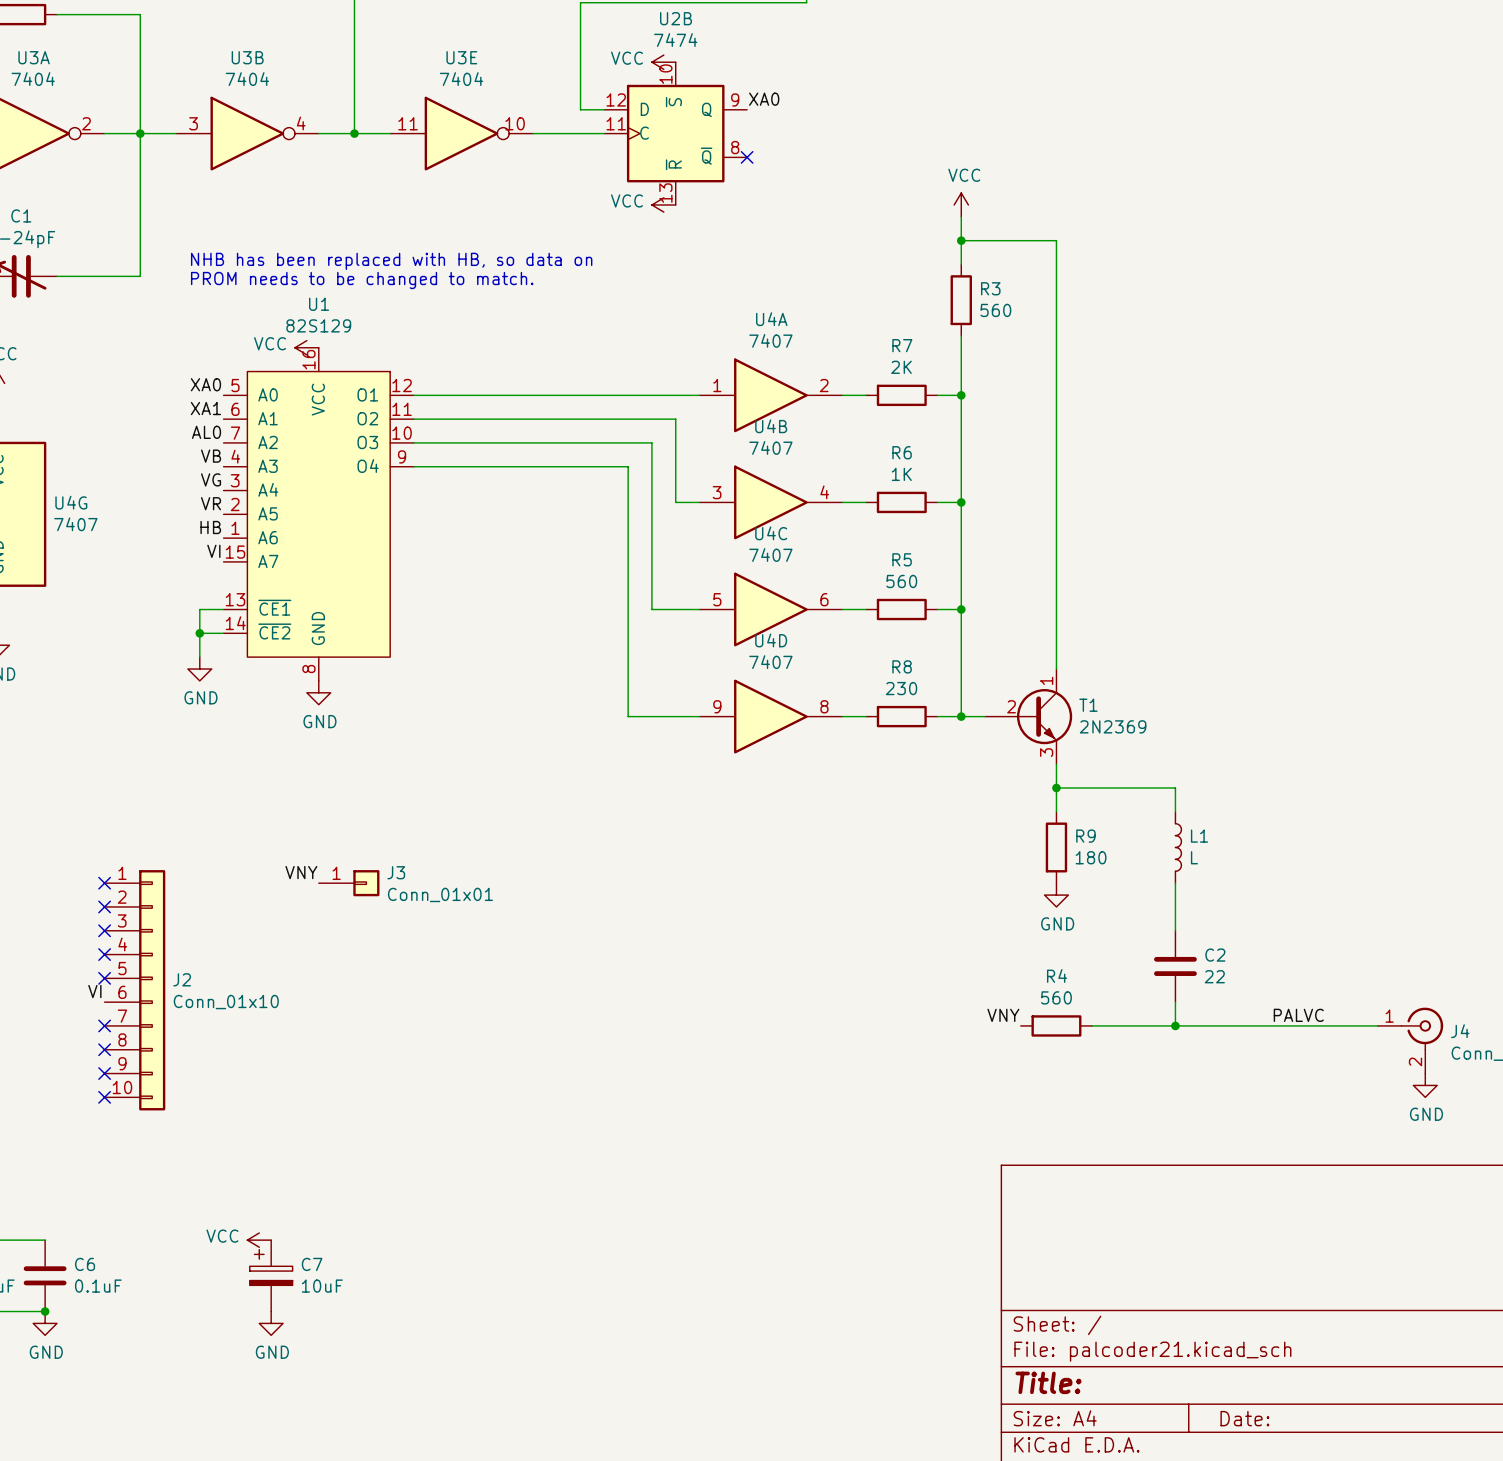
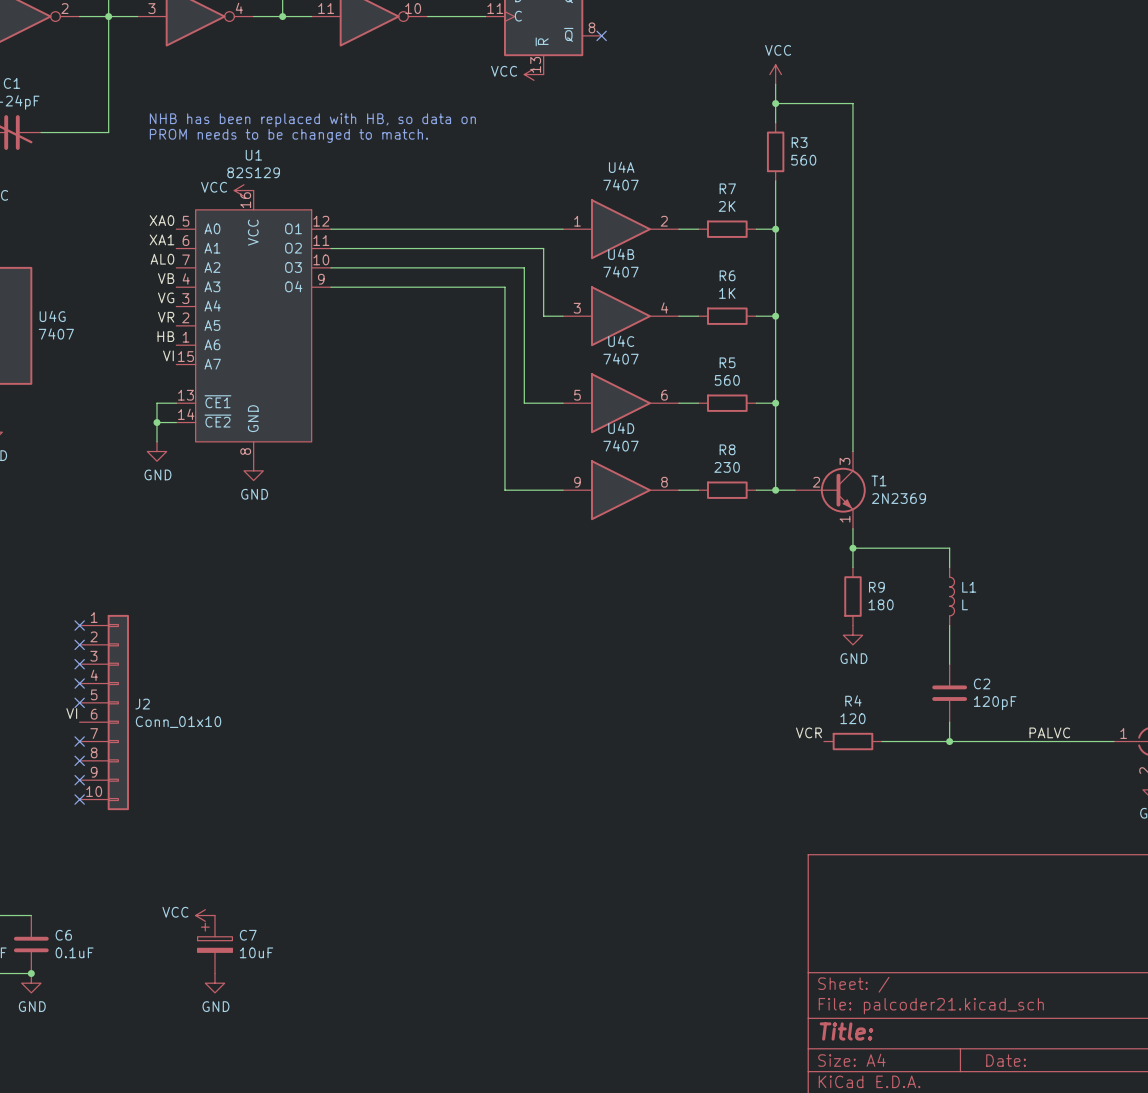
T1 pin number: 1 (1046, 680) -> 3 (845, 461)
T1 pin number: 3 (1046, 752) -> 1 (845, 519)
label: VNY (301, 872) -> none
J3: Conn_01x01 (349, 883) -> none
C2 value: 22 (1214, 976) -> 120pF (995, 703)
R4 value: 560 (1056, 997) -> 120 (852, 718)
label: VNY (1003, 1015) -> VCR (808, 732)

